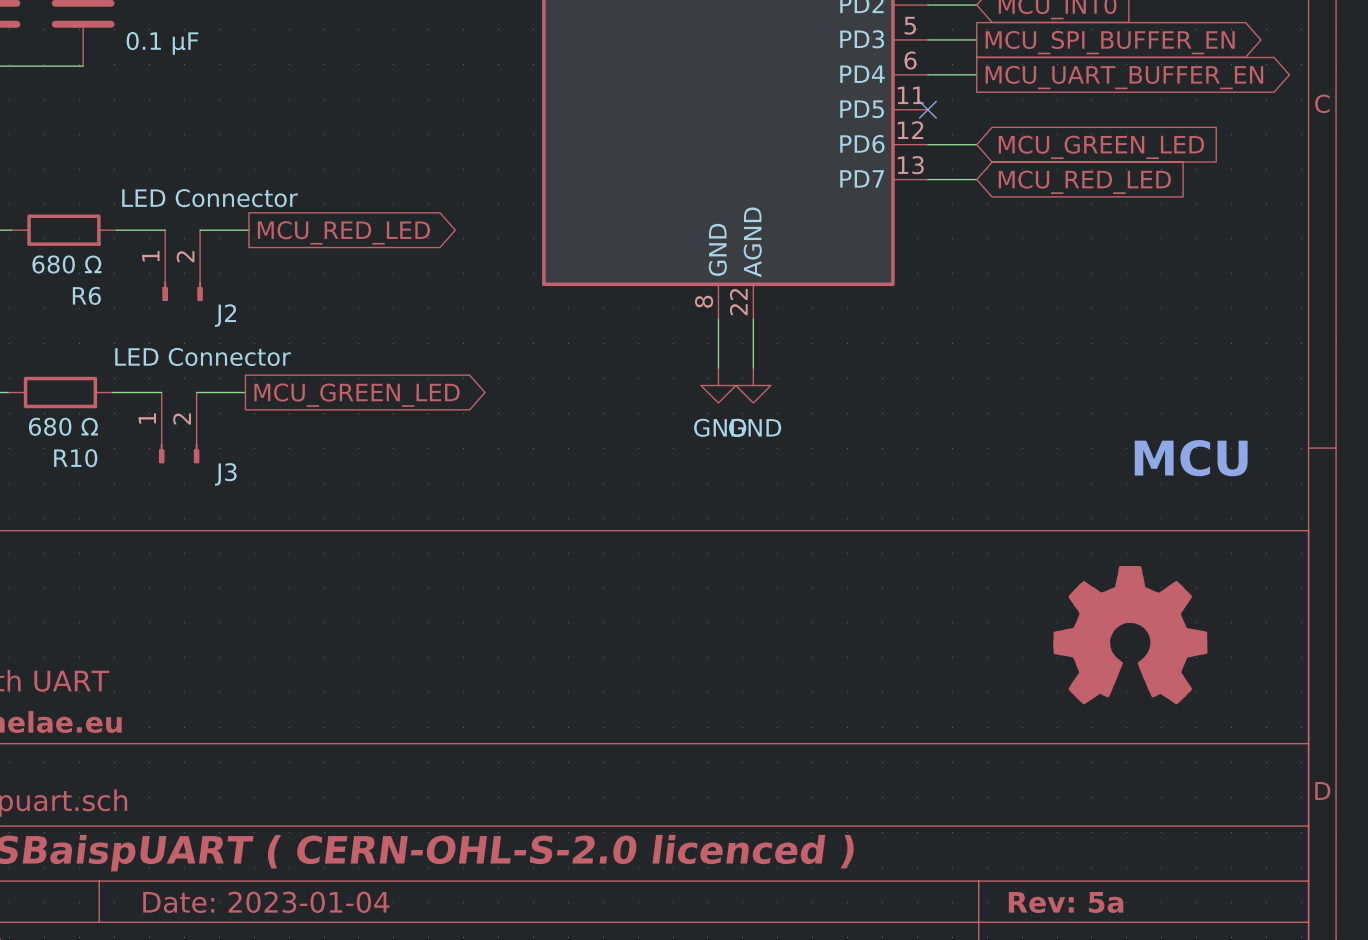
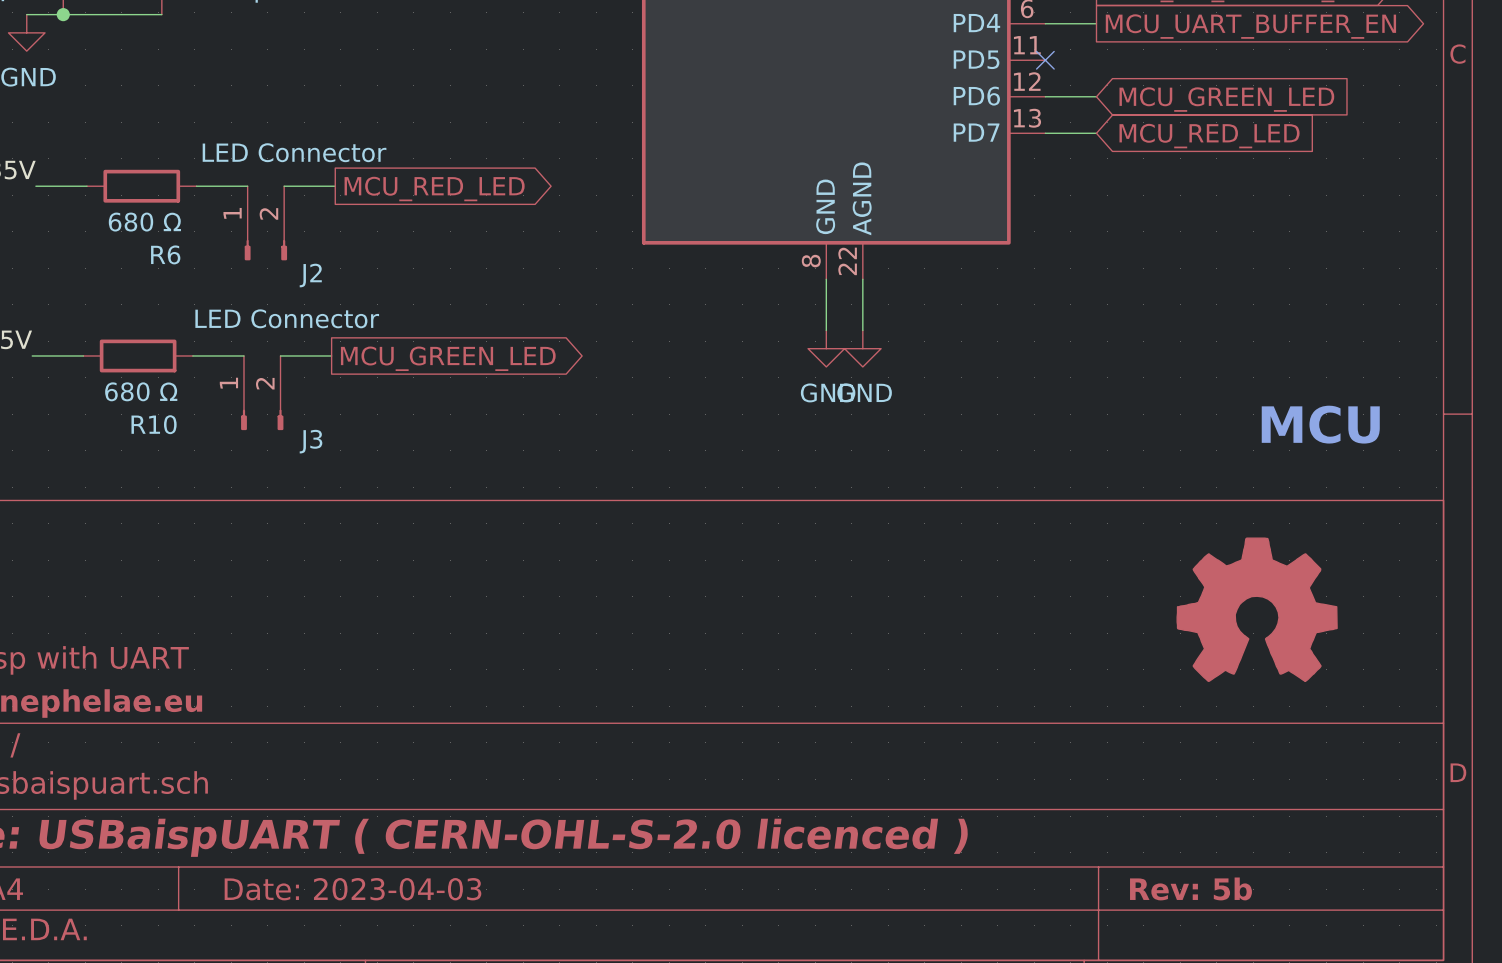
title block: Date: 2023-01-04 (266, 902) -> Date: 2023-04-03 (352, 889)
title block: Rev: 5a (1066, 902) -> Rev: 5b (1190, 888)

